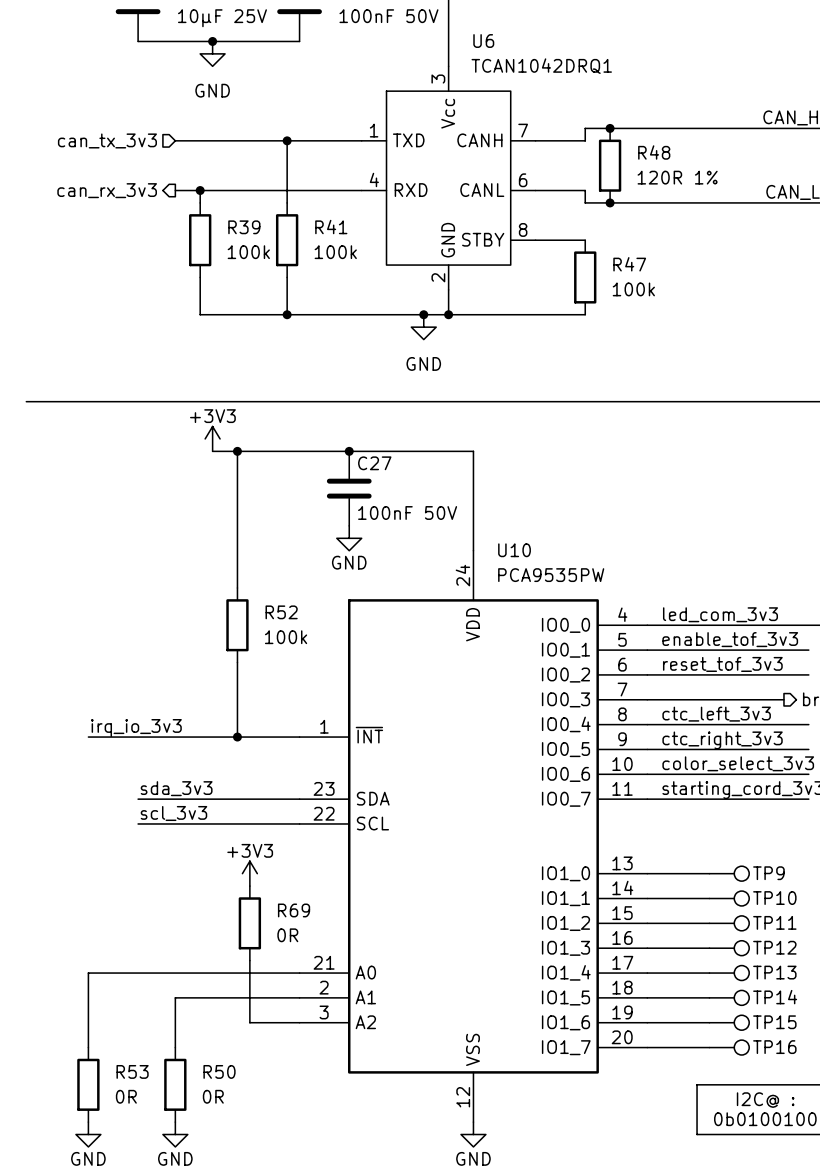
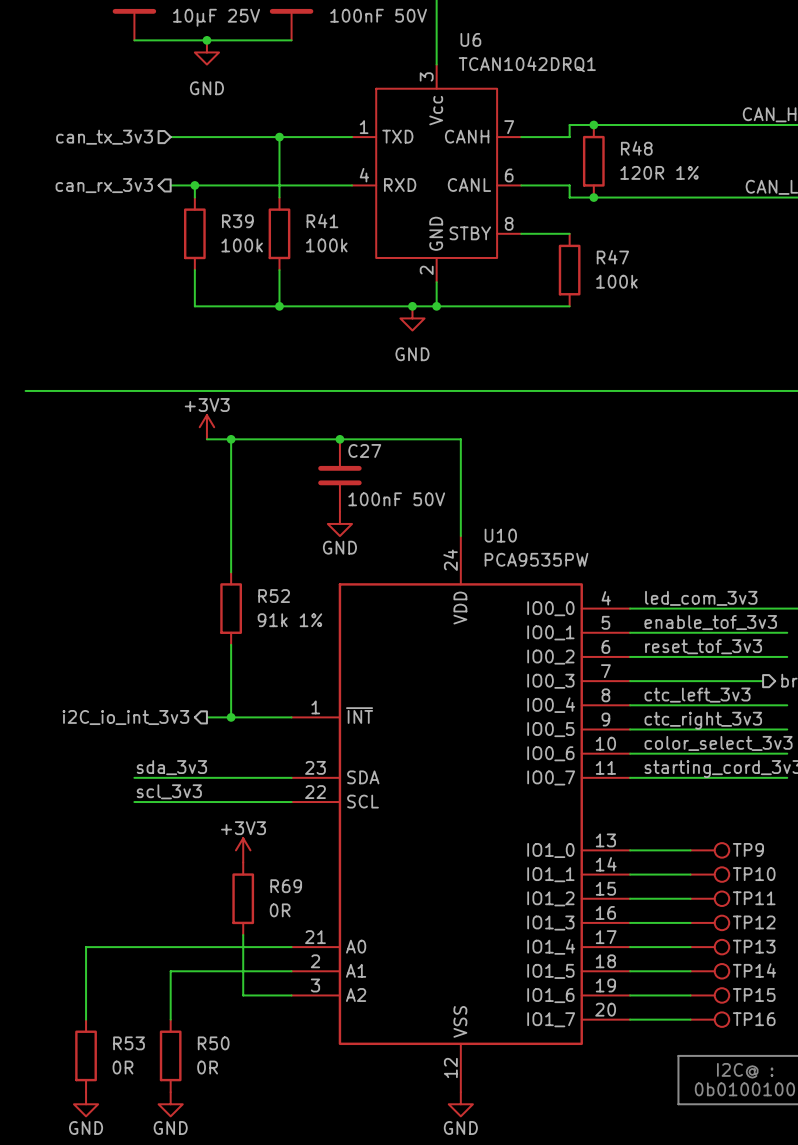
R52 value: 100k (286, 637) -> 91k 1% (289, 620)
label: irq_io_3v3 (136, 728) -> none
wire: (88, 737) (212, 737) -> none
hierarchical label: none -> i2C_io_int_3v3 (125, 717)

